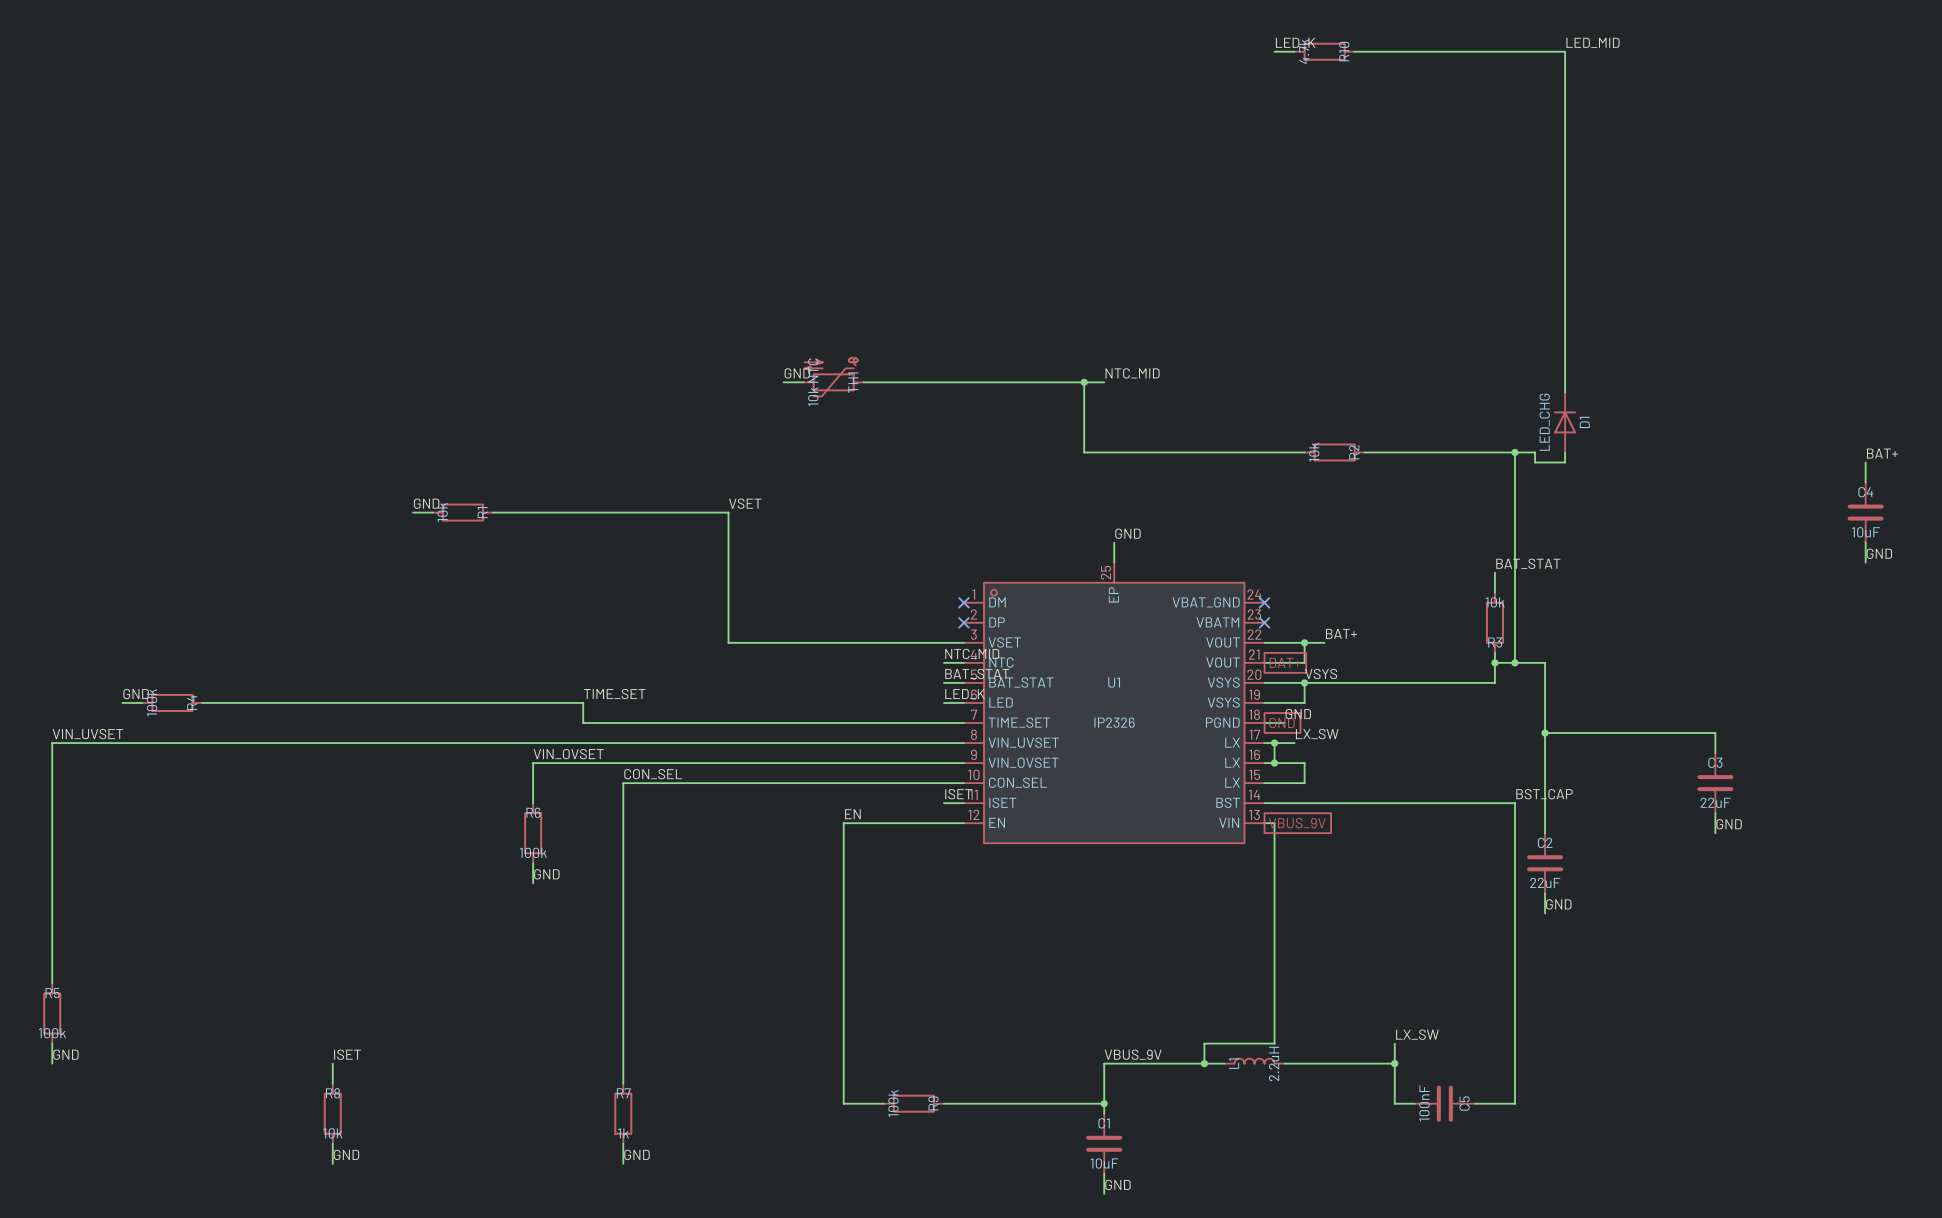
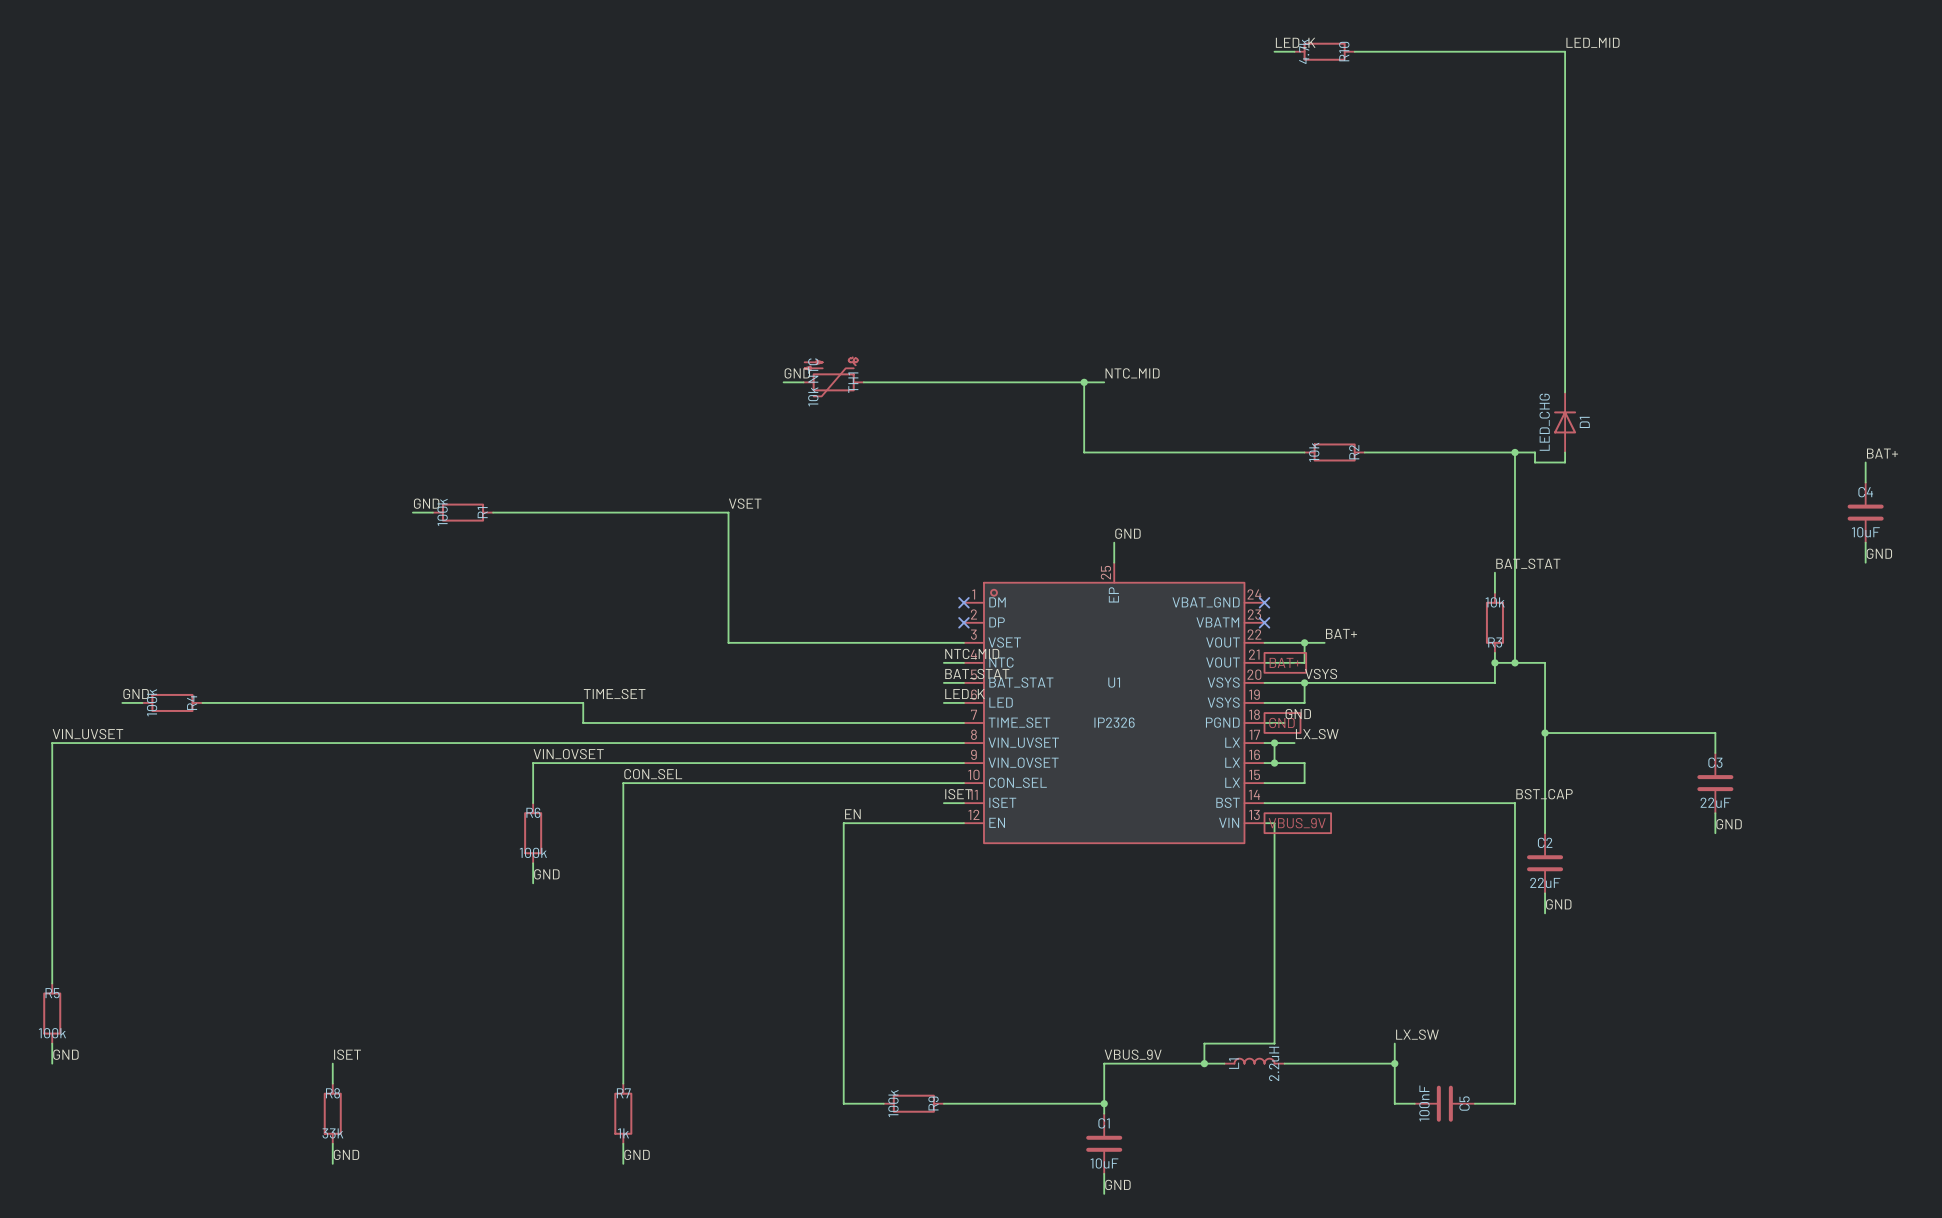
R1 value: 10k (442, 512) -> 100k (442, 512)
R8 value: 10k (332, 1133) -> 33k (332, 1133)

